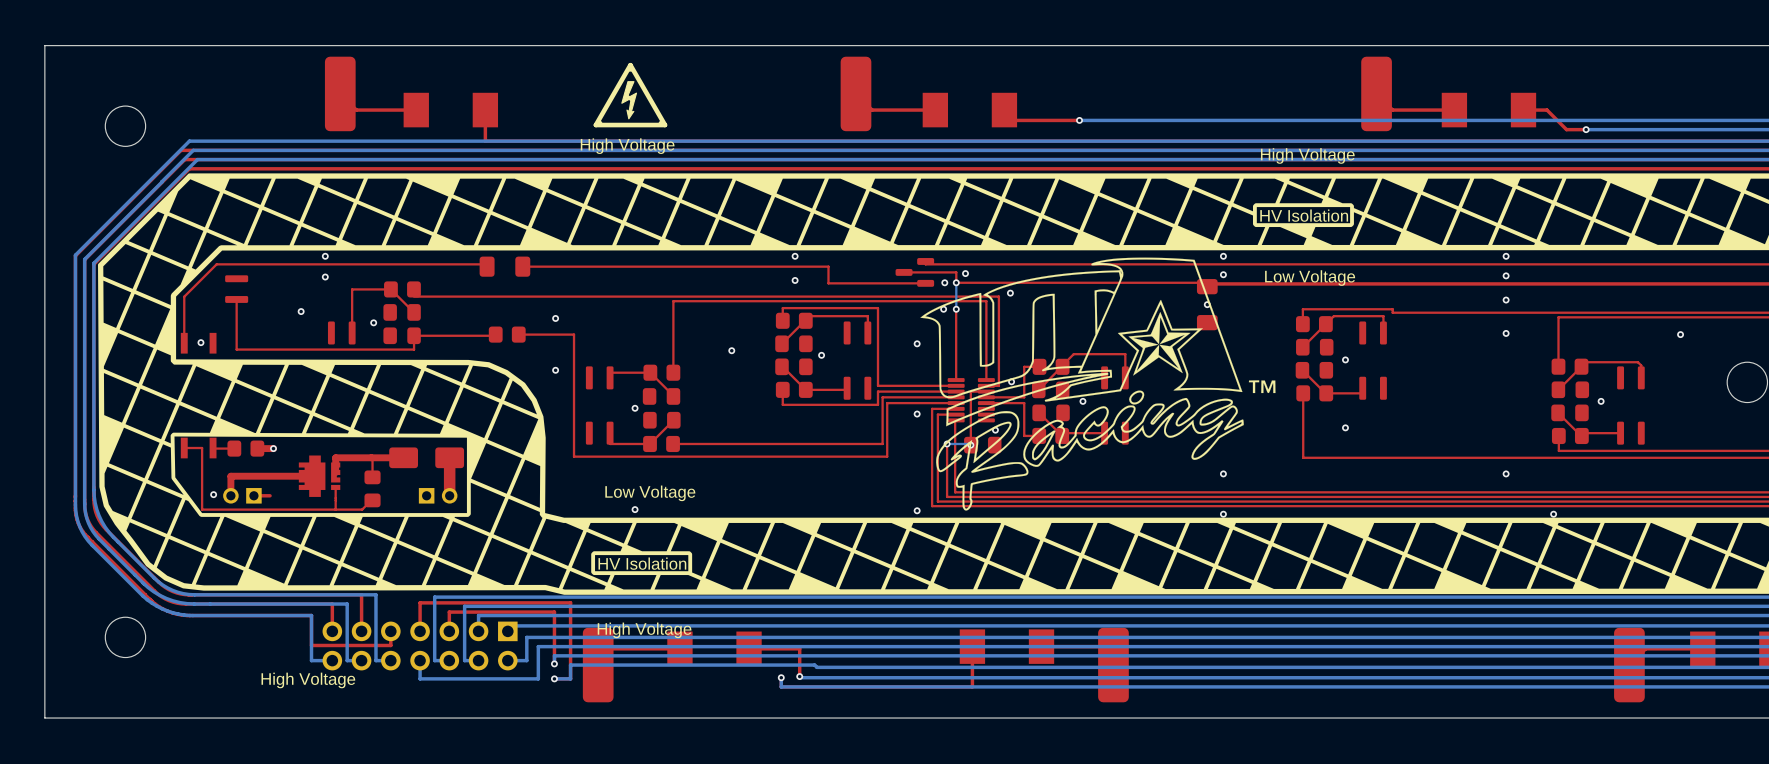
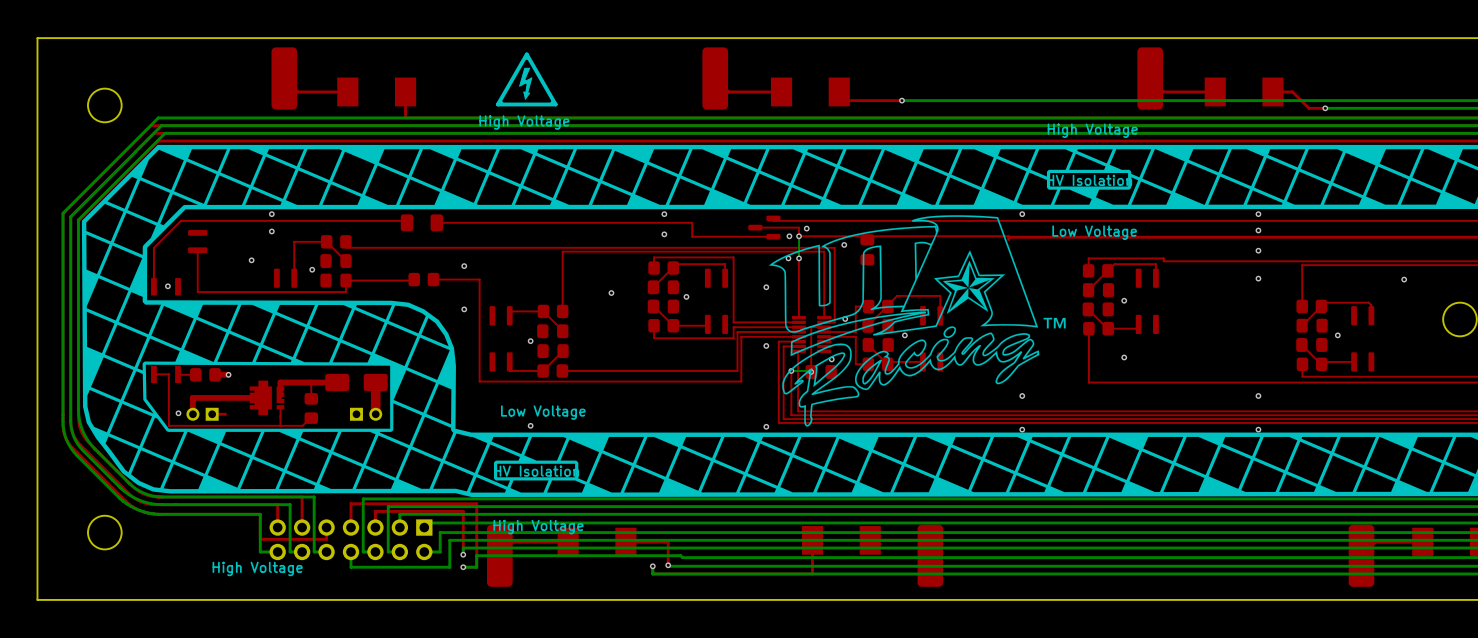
via: (1223, 274) -> none
part: none -> (867, 249)
part: (1207, 304) -> none
via: (1207, 304) -> none
via position: (1553, 514) -> (1258, 429)

